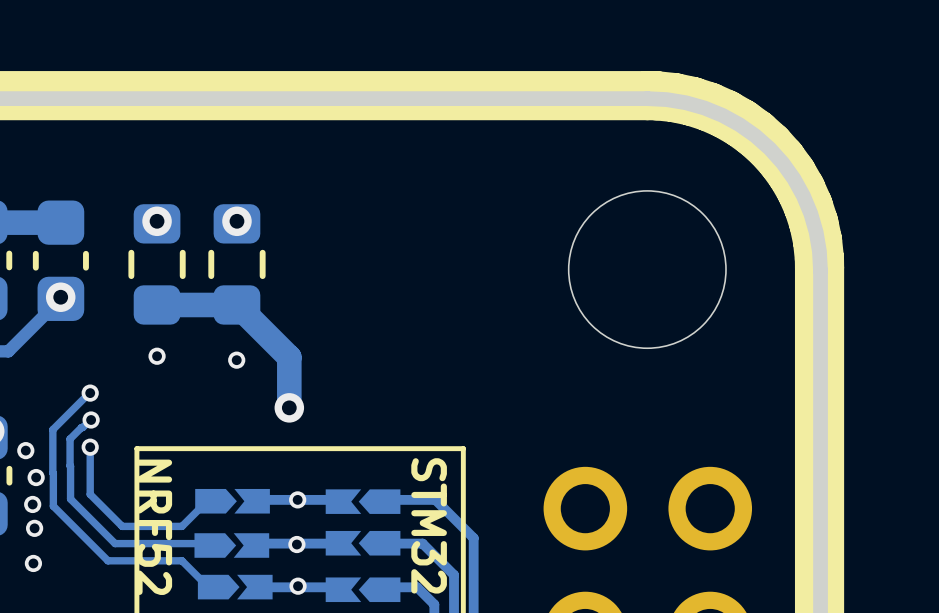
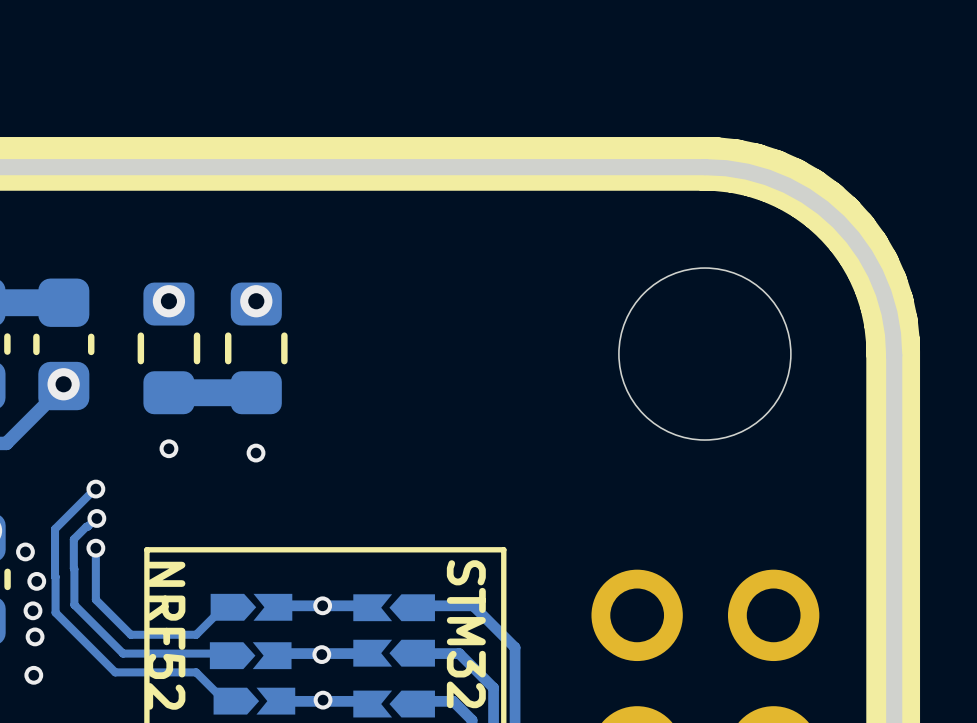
track: (236, 304) (289, 357) (289, 407) -> none
via: (289, 407) -> none

